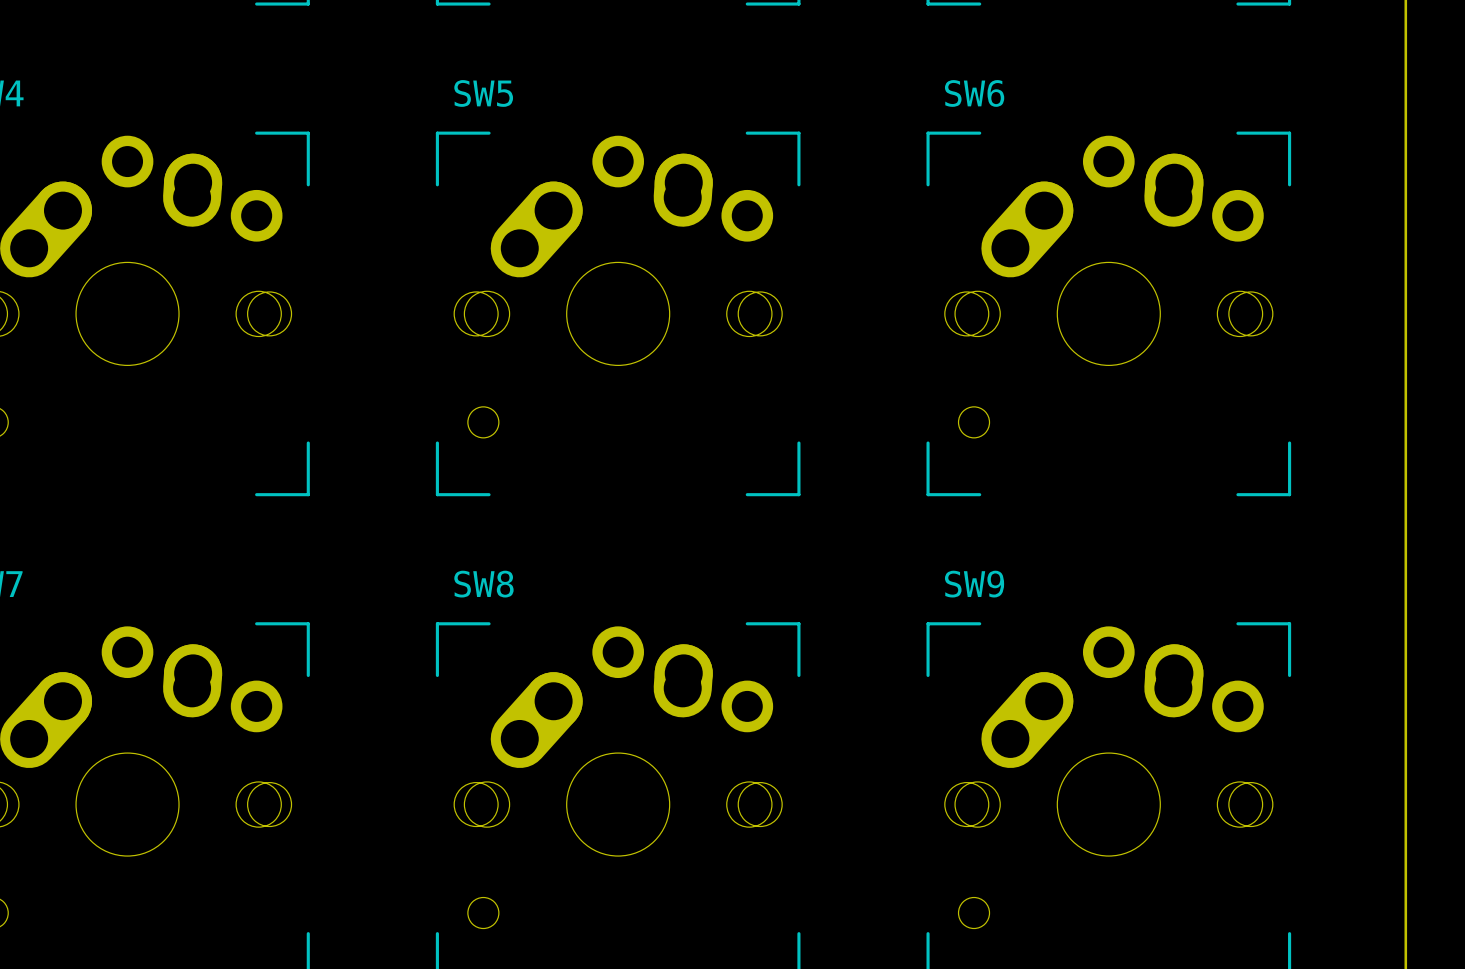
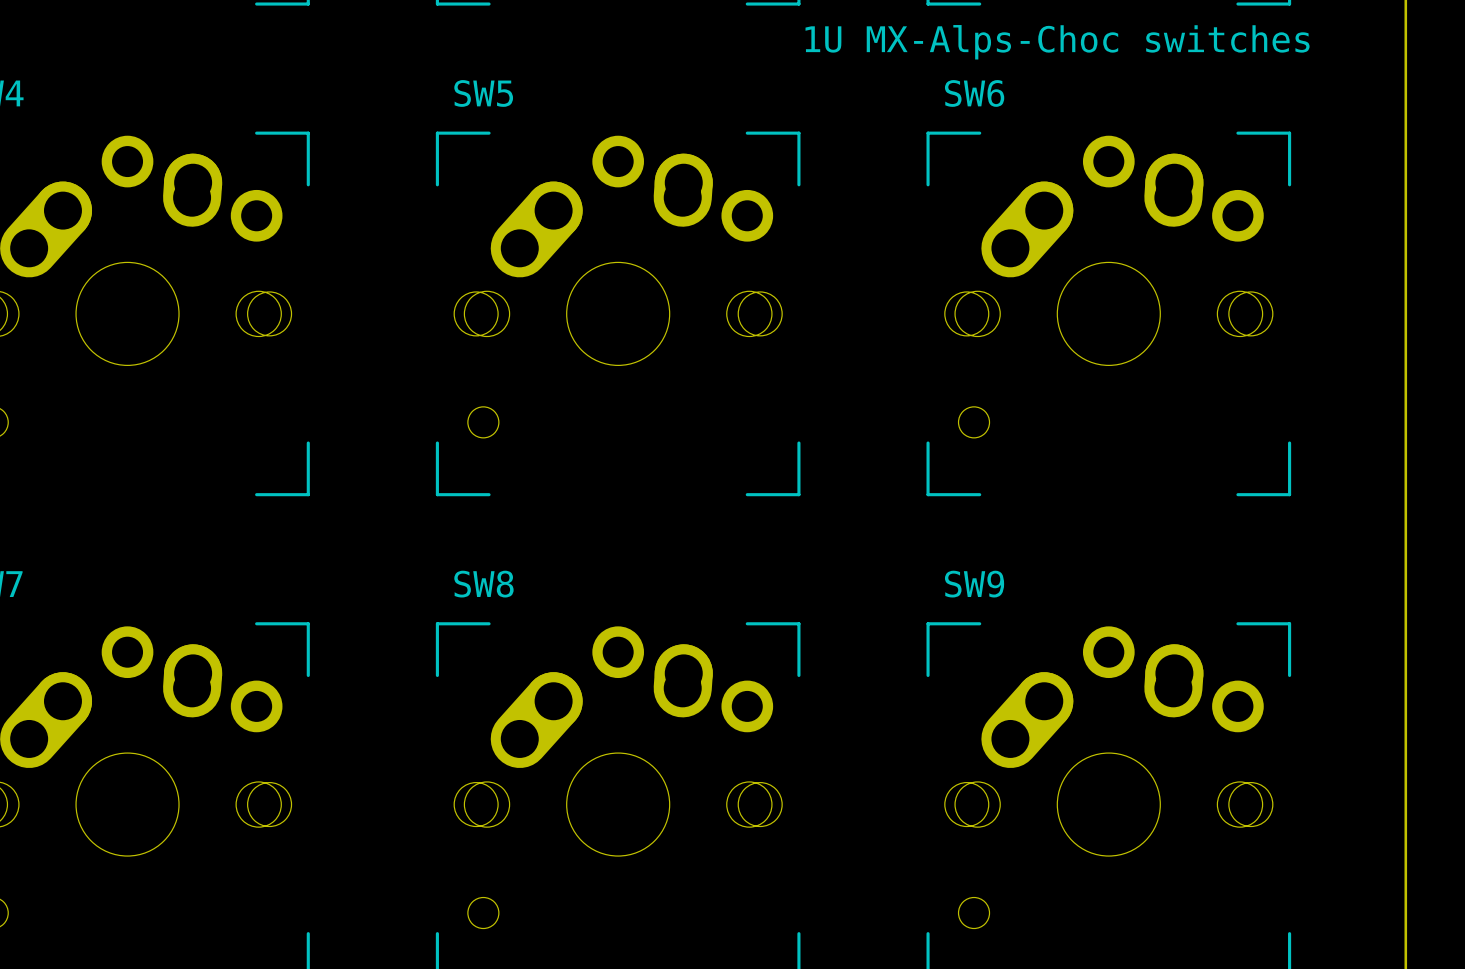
text: none -> 1U MX-Alps-Choc switches (1057, 42)

